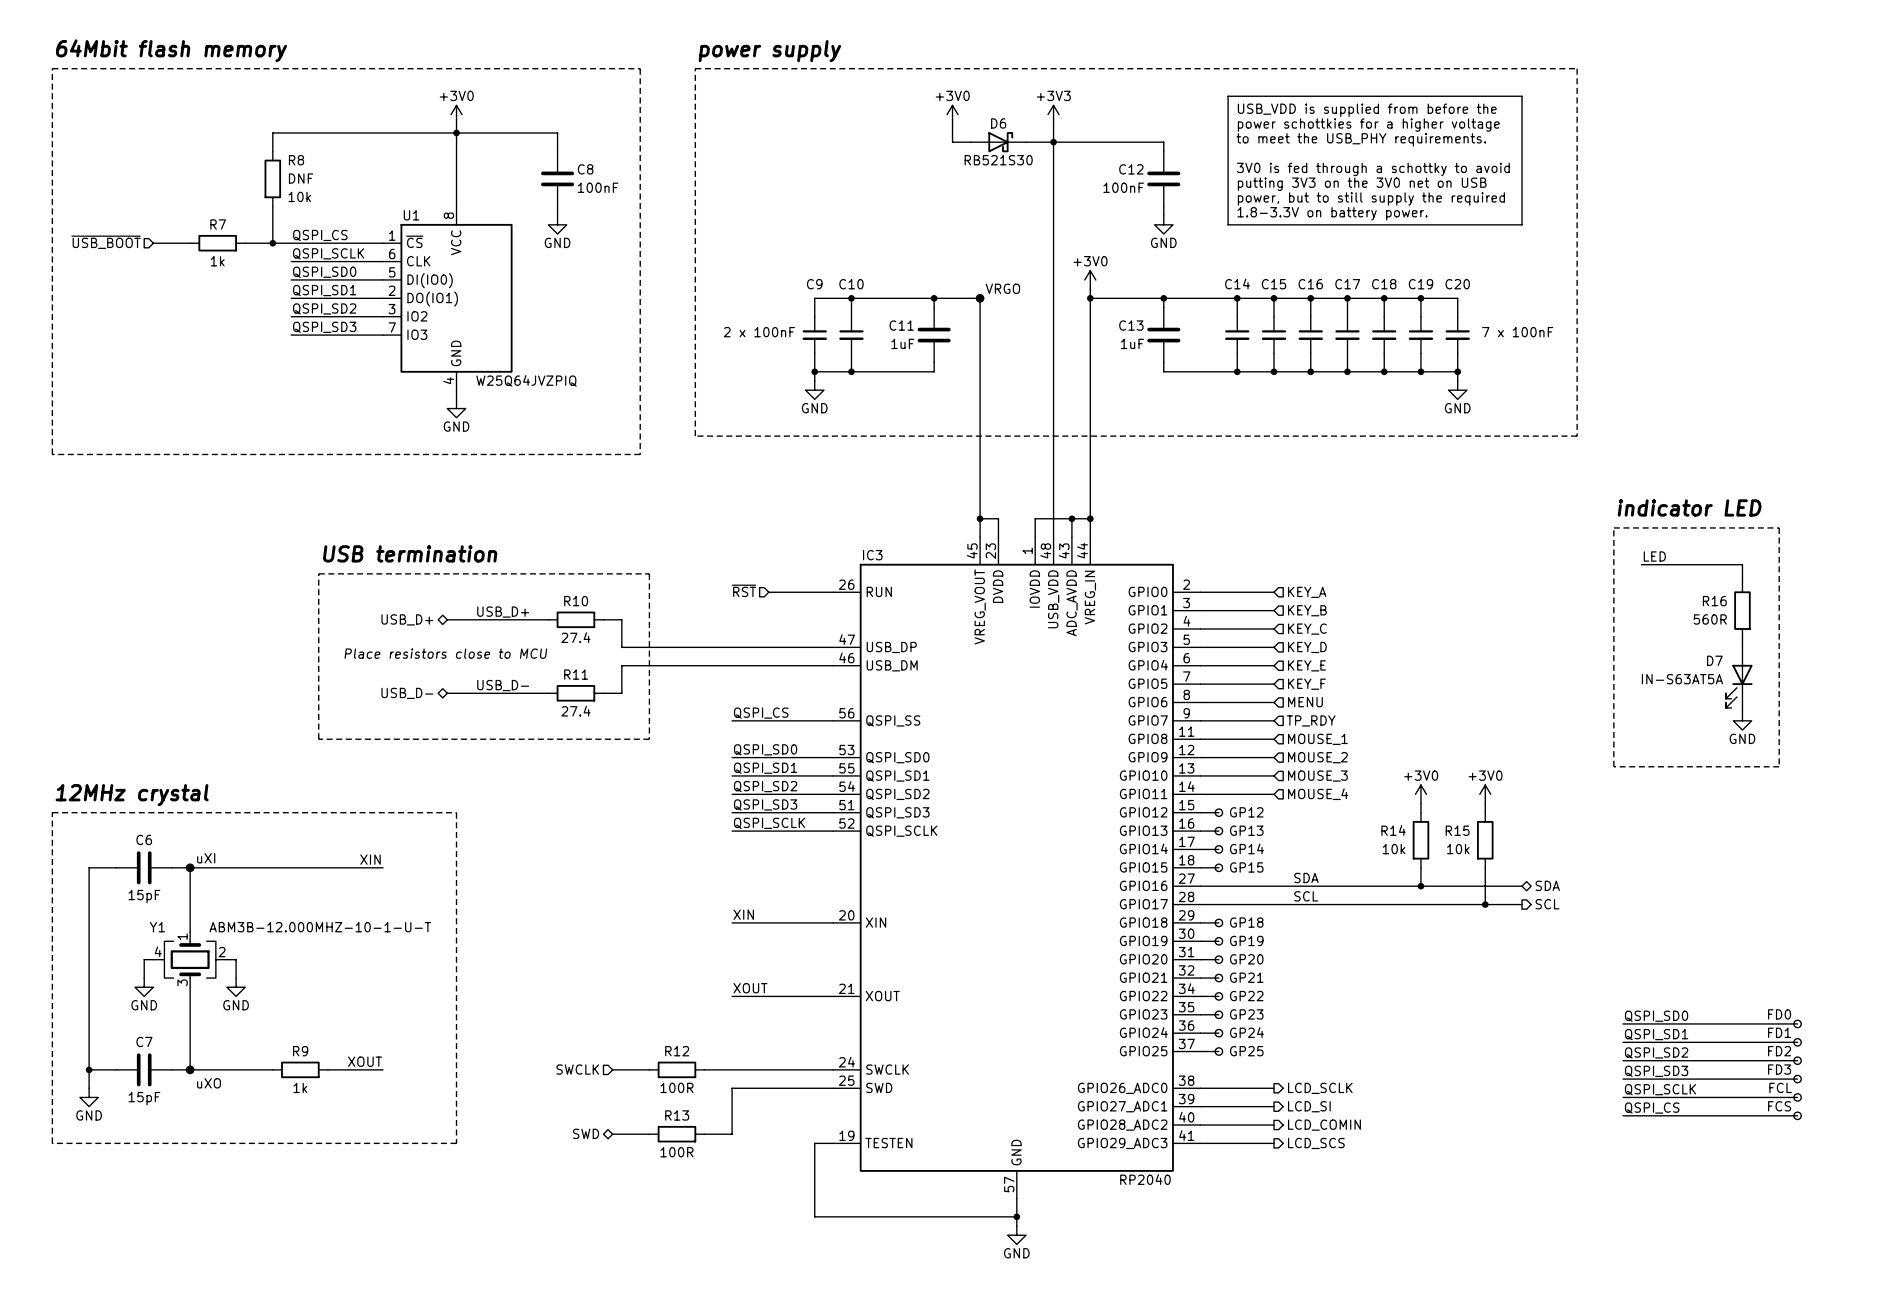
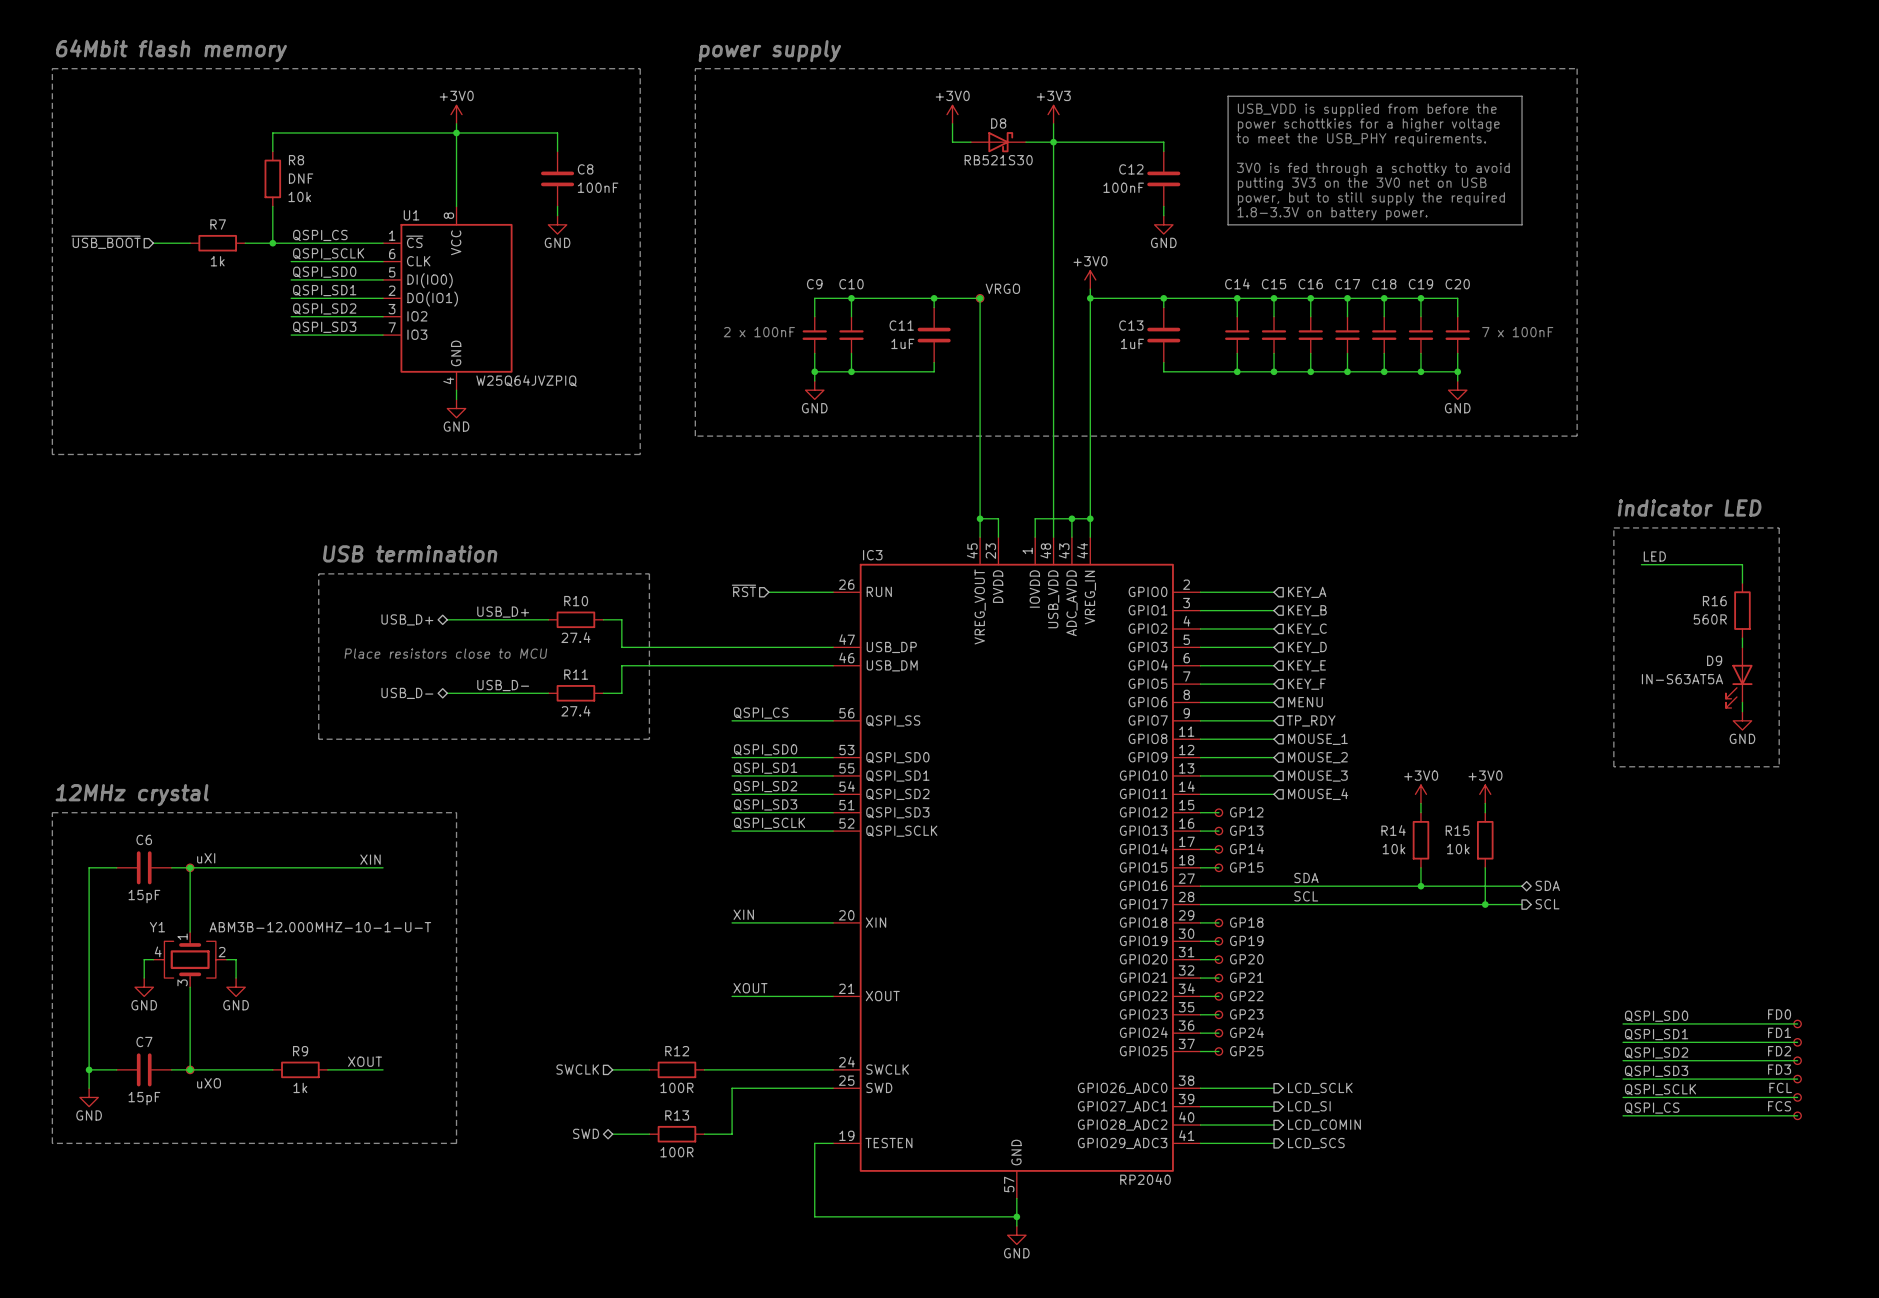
D6 name: D6 (998, 123) -> D8 (998, 123)
D7 name: D7 (1714, 660) -> D9 (1714, 660)

